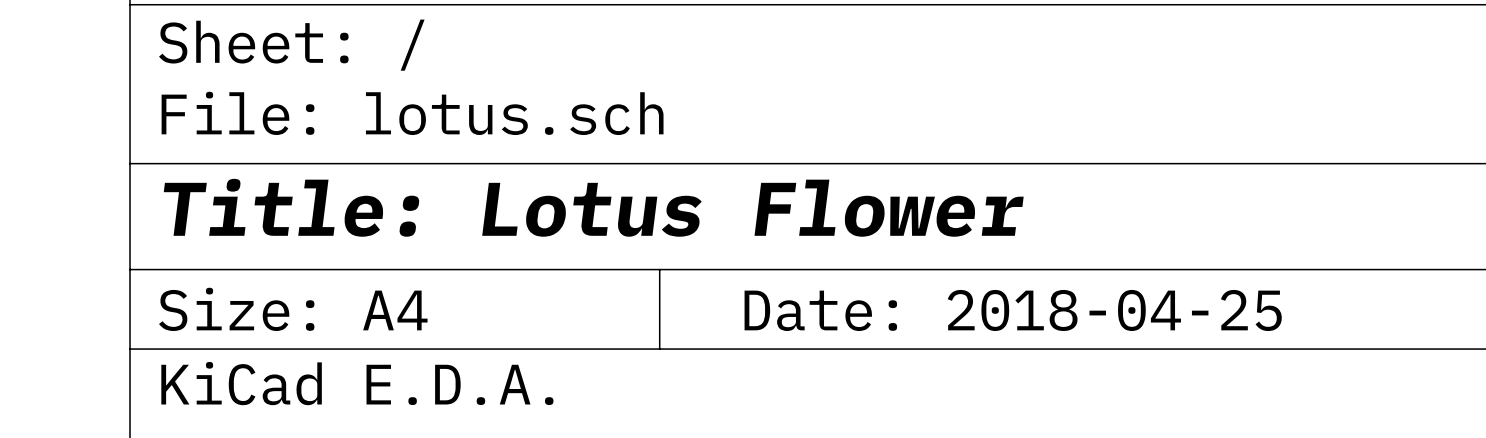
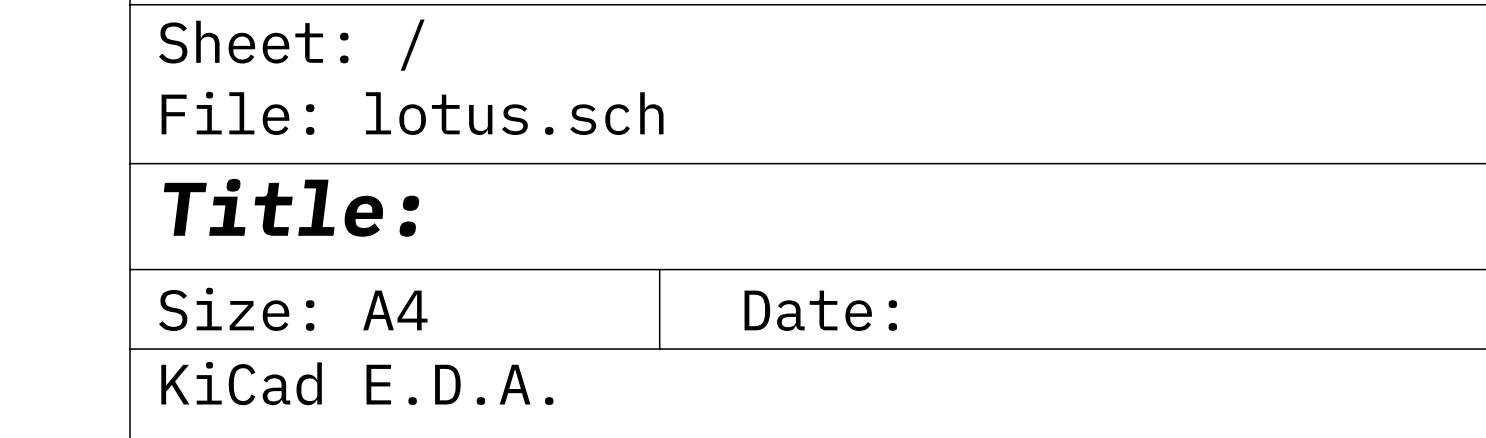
title block: Title: Lotus Flower (593, 207) -> Title: (291, 207)
title block: Date: 2018-04-25 (1013, 310) -> Date: (820, 310)

